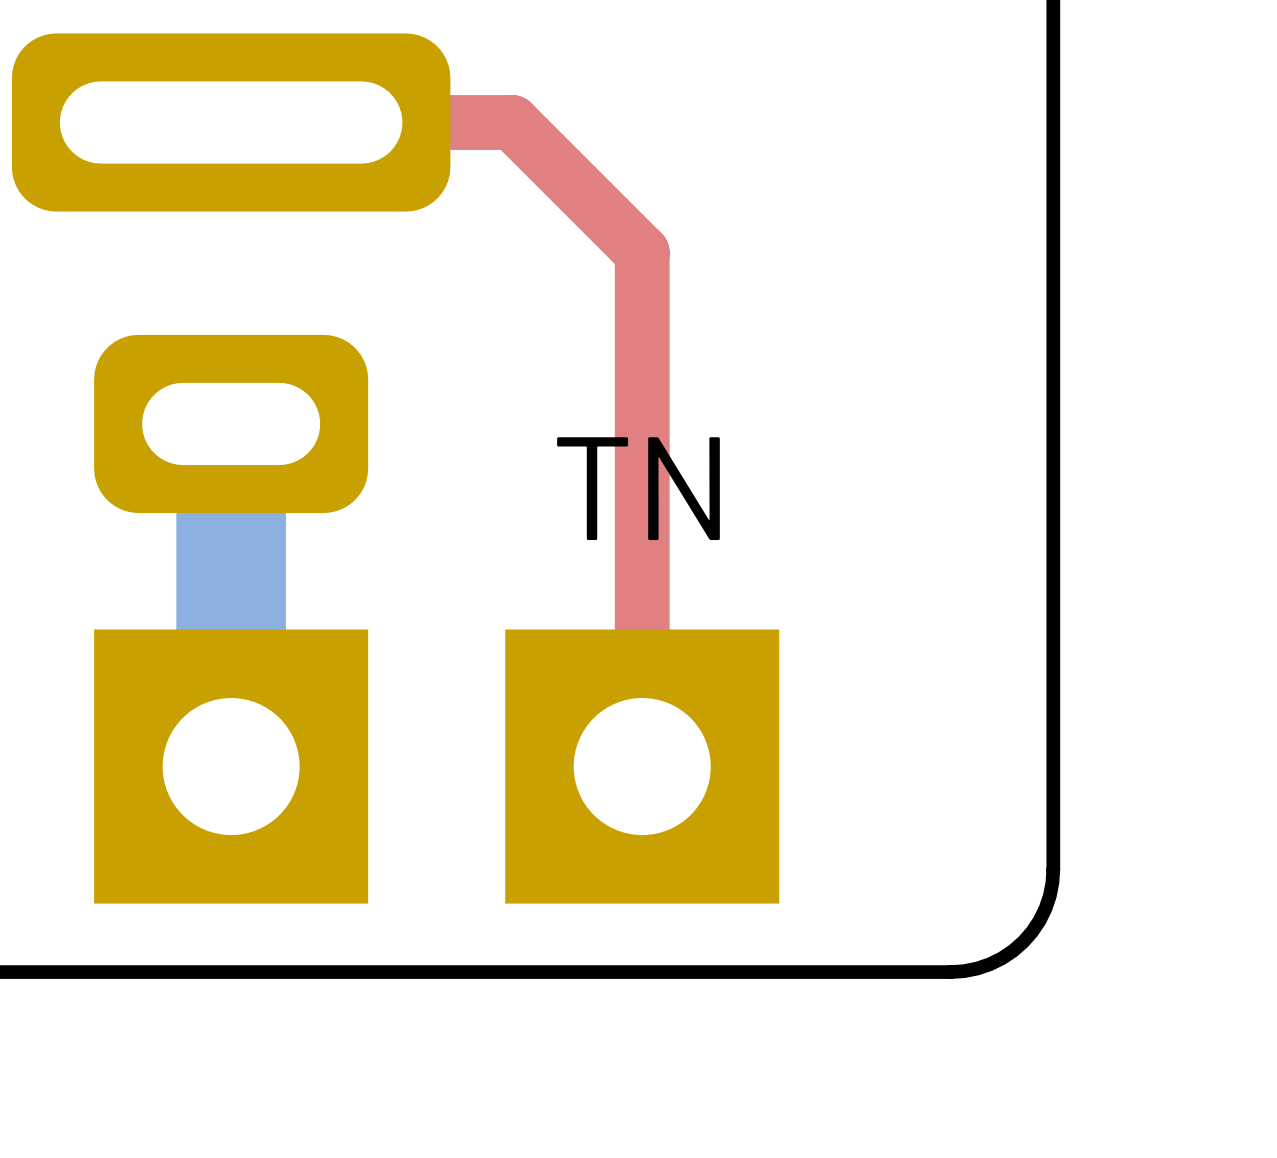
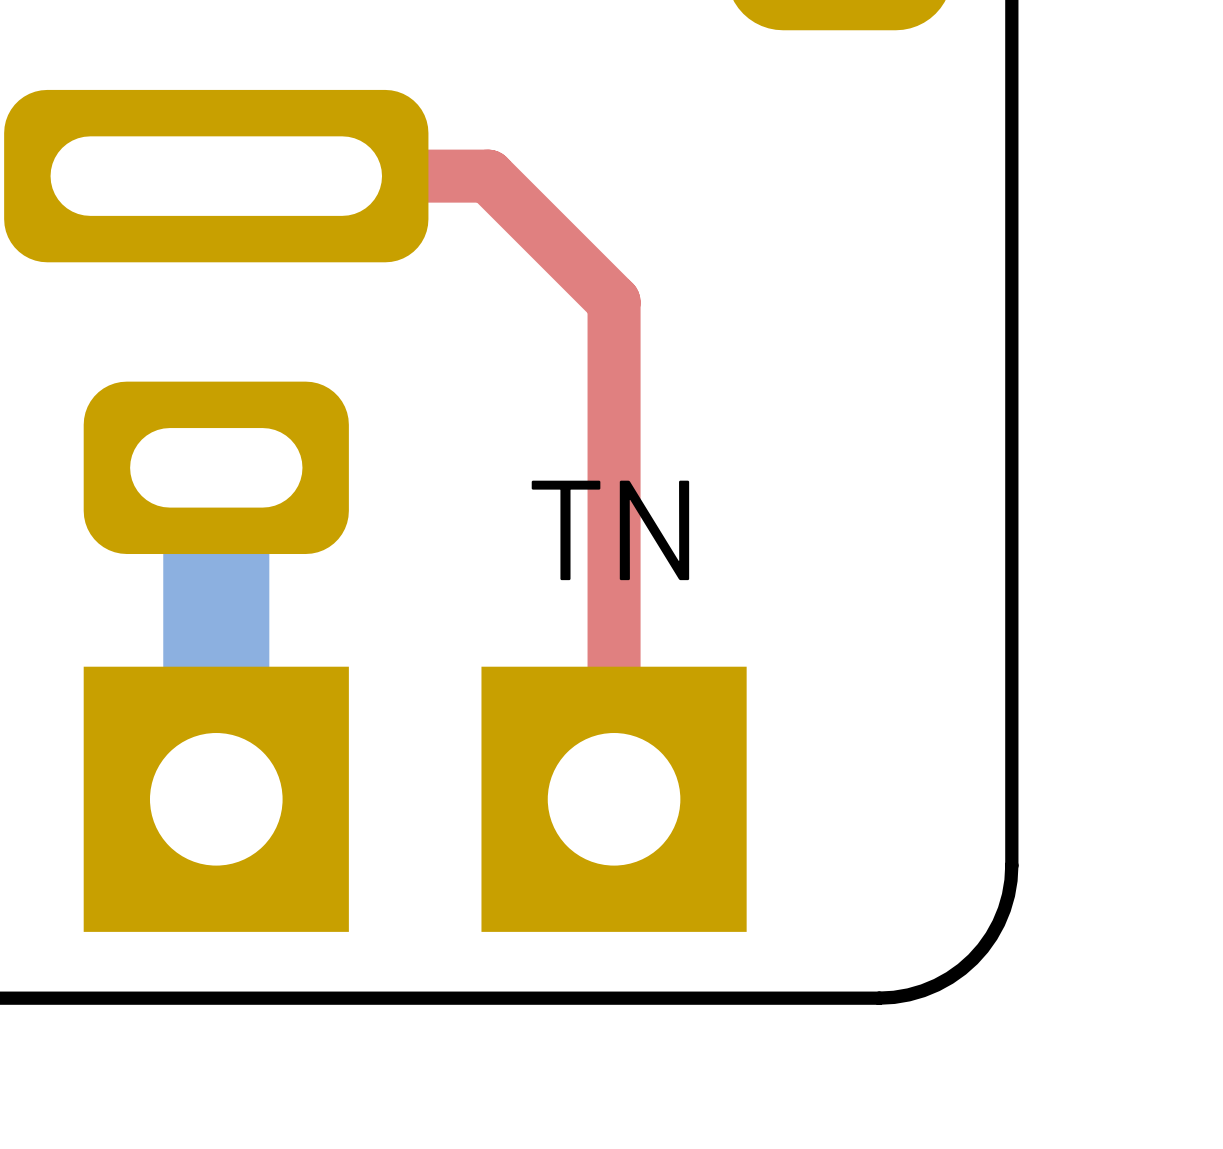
board edge: (1053, 835) (1053, 869) (1049, 895) (1039, 920) (1023, 941) (1001, 958) (977, 968) (950, 972) (916, 972) -> (1011, 865) (1011, 880) (1004, 909) (991, 936) (973, 959) (961, 969) (936, 985) (908, 994) (879, 998)

